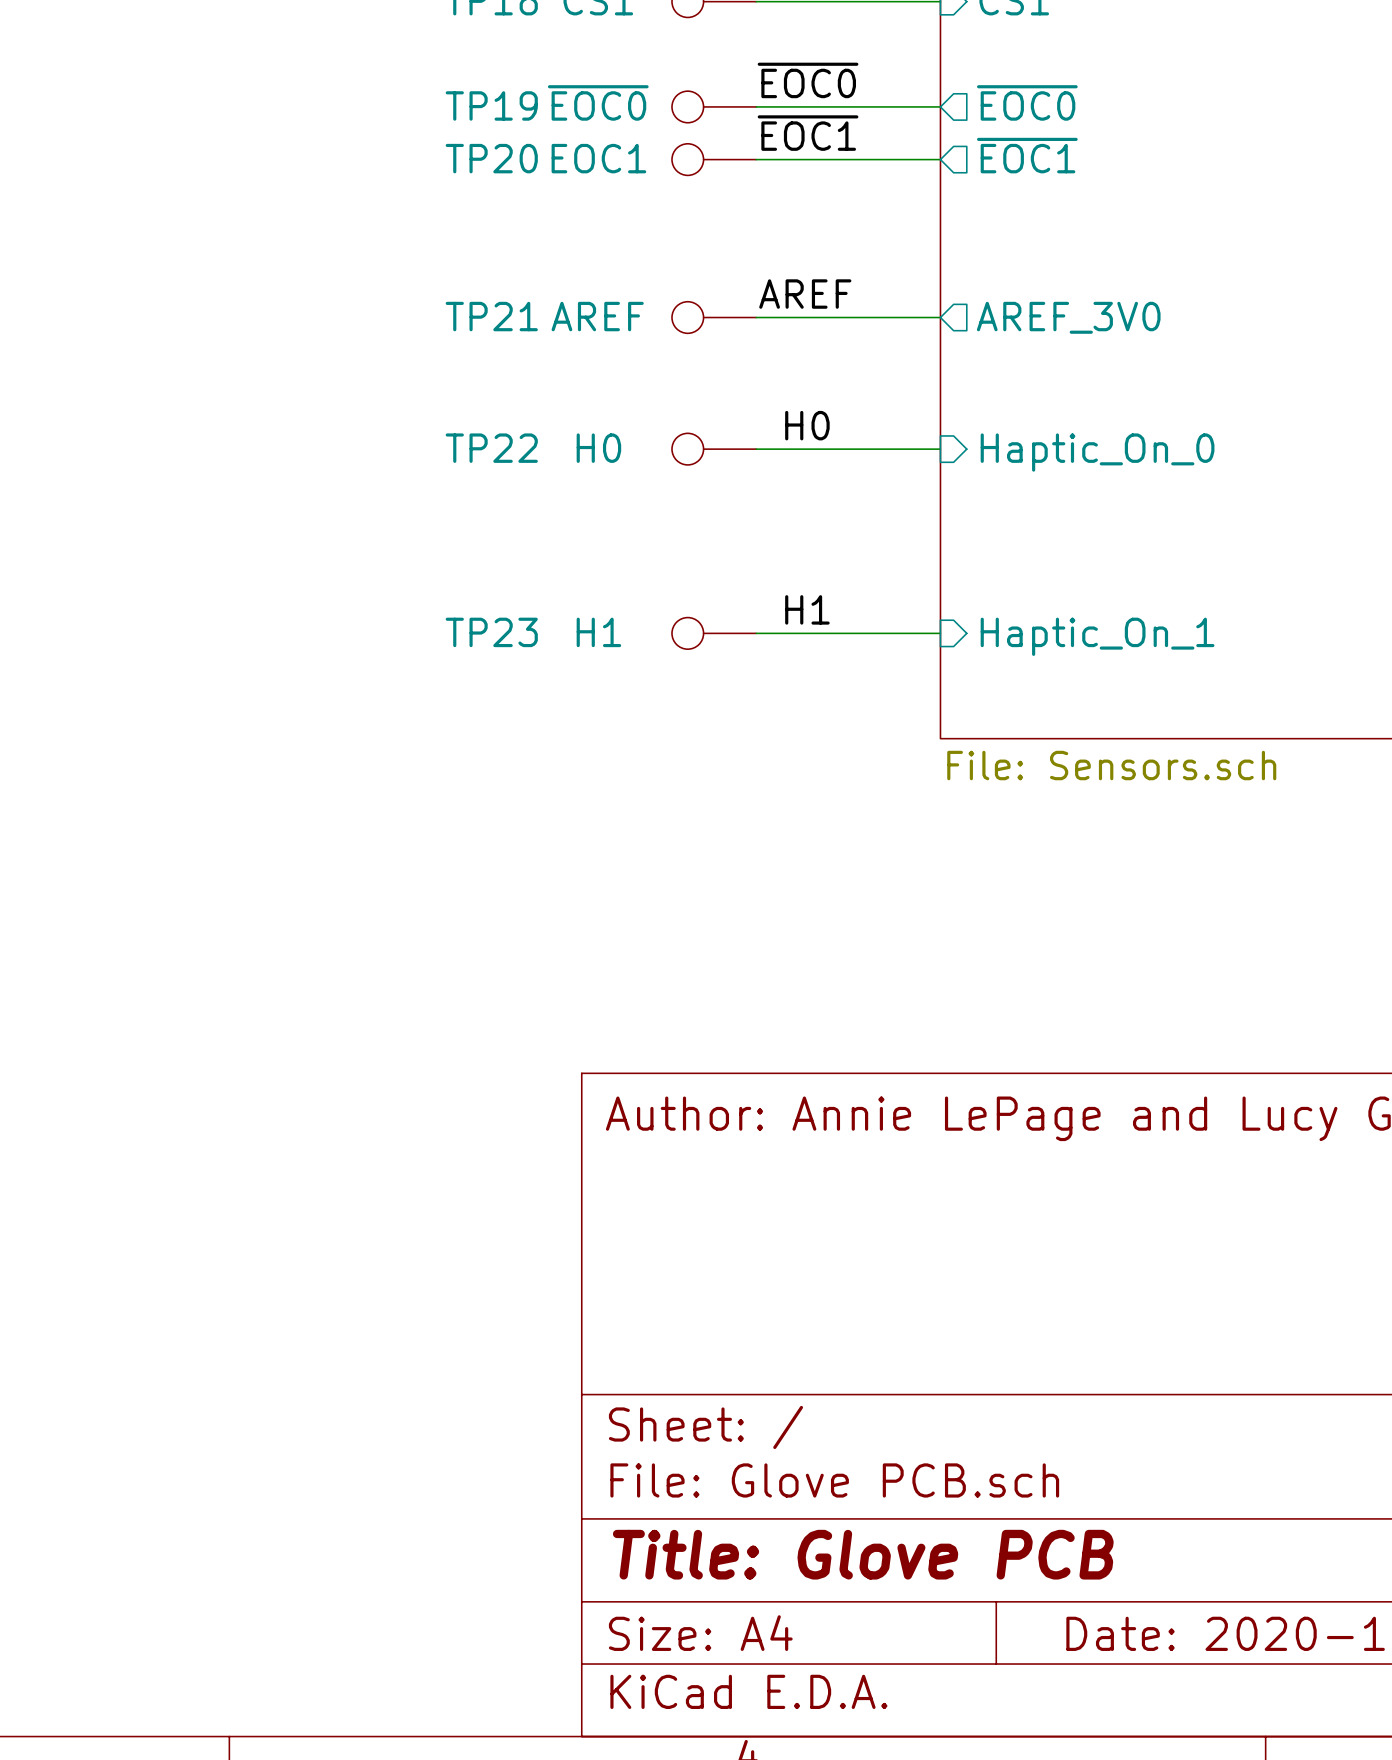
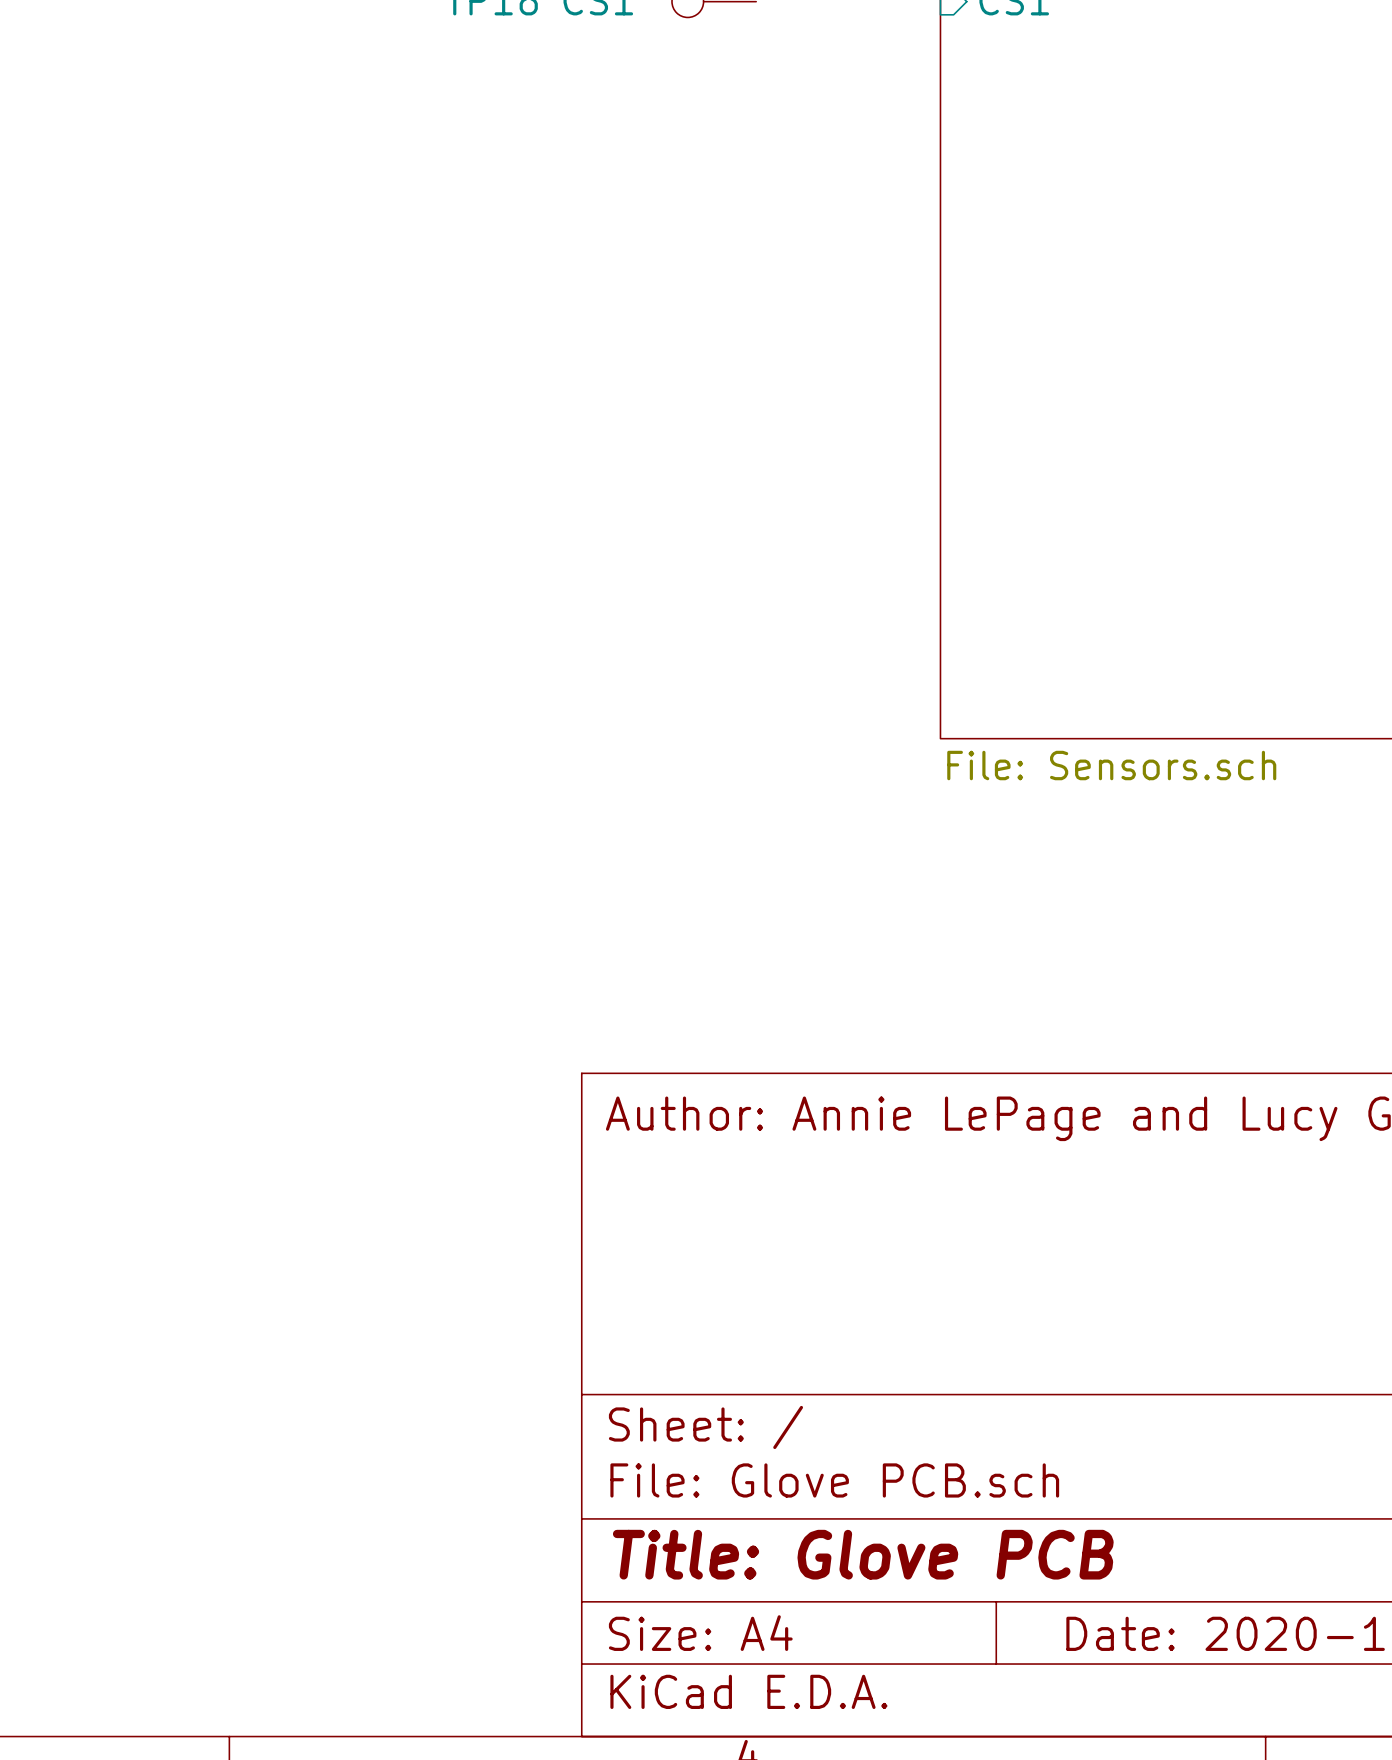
wire: (756, 1) (940, 1) -> none
label: ~{EOC0} (808, 80) -> none
sheet pin: ~{EOC0} (1027, 102) -> none
TP19: ~{EOC0} (714, 106) -> none
wire: (756, 106) (940, 106) -> none
label: ~{EOC1} (808, 133) -> none
sheet pin: ~{EOC1} (1027, 155) -> none
TP20: EOC1 (714, 159) -> none
wire: (756, 159) (940, 159) -> none
label: AREF (805, 294) -> none
TP21: AREF (714, 317) -> none
wire: (756, 317) (940, 317) -> none
sheet pin: AREF_3V0 (1068, 317) -> none
label: H0 (807, 425) -> none
TP22: H0 (714, 449) -> none
wire: (756, 449) (940, 449) -> none
sheet pin: Haptic_On_0 (1097, 452) -> none
label: H1 (807, 609) -> none
TP23: H1 (714, 633) -> none
wire: (756, 633) (940, 633) -> none
sheet pin: Haptic_On_1 (1097, 636) -> none

